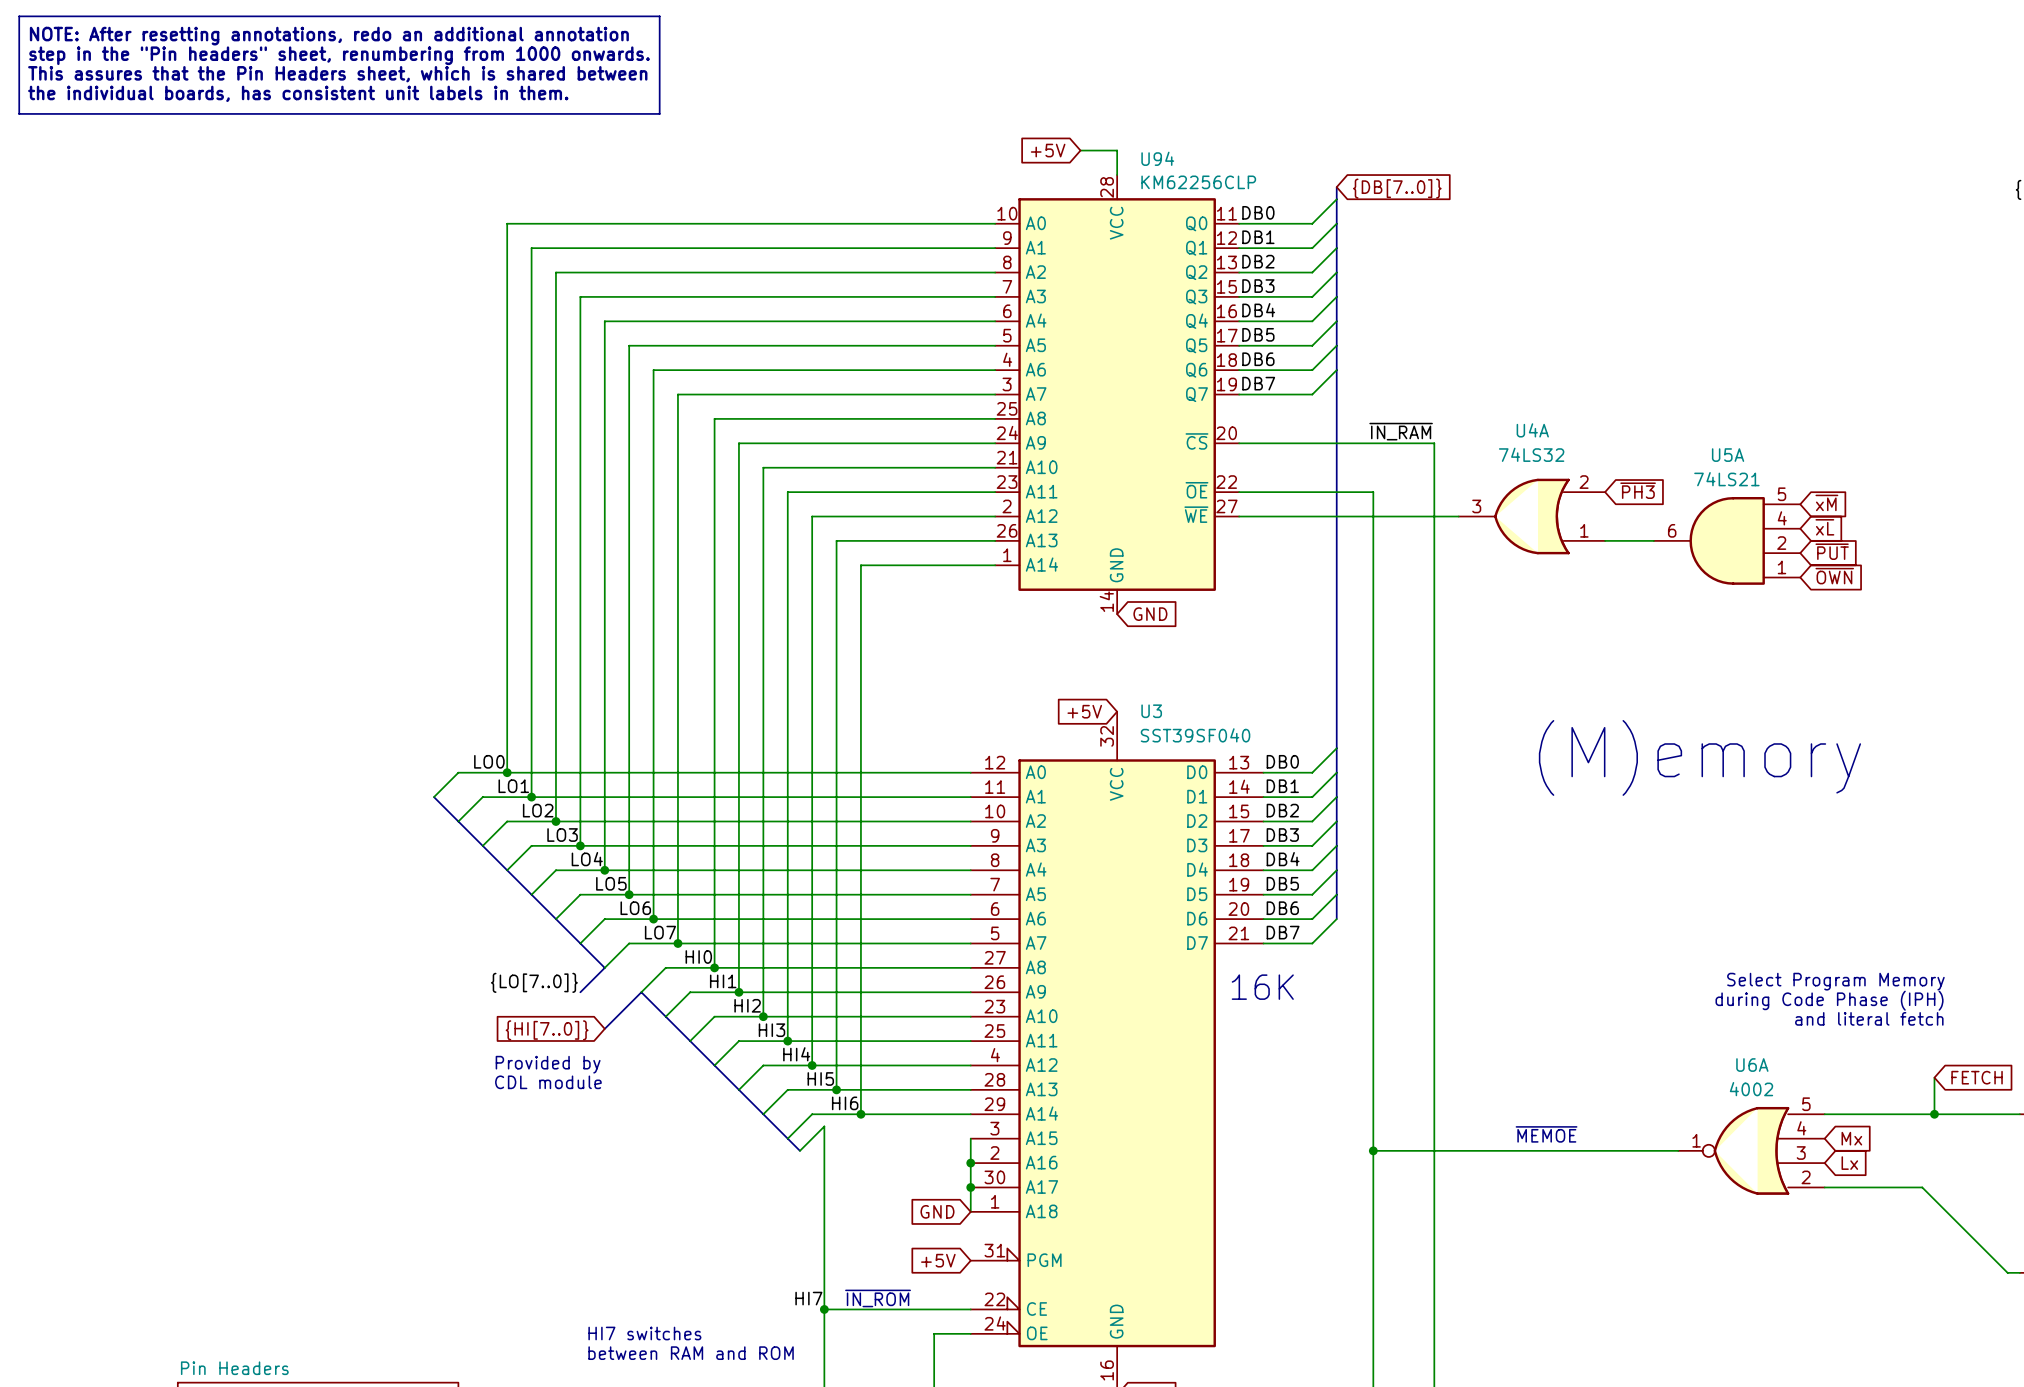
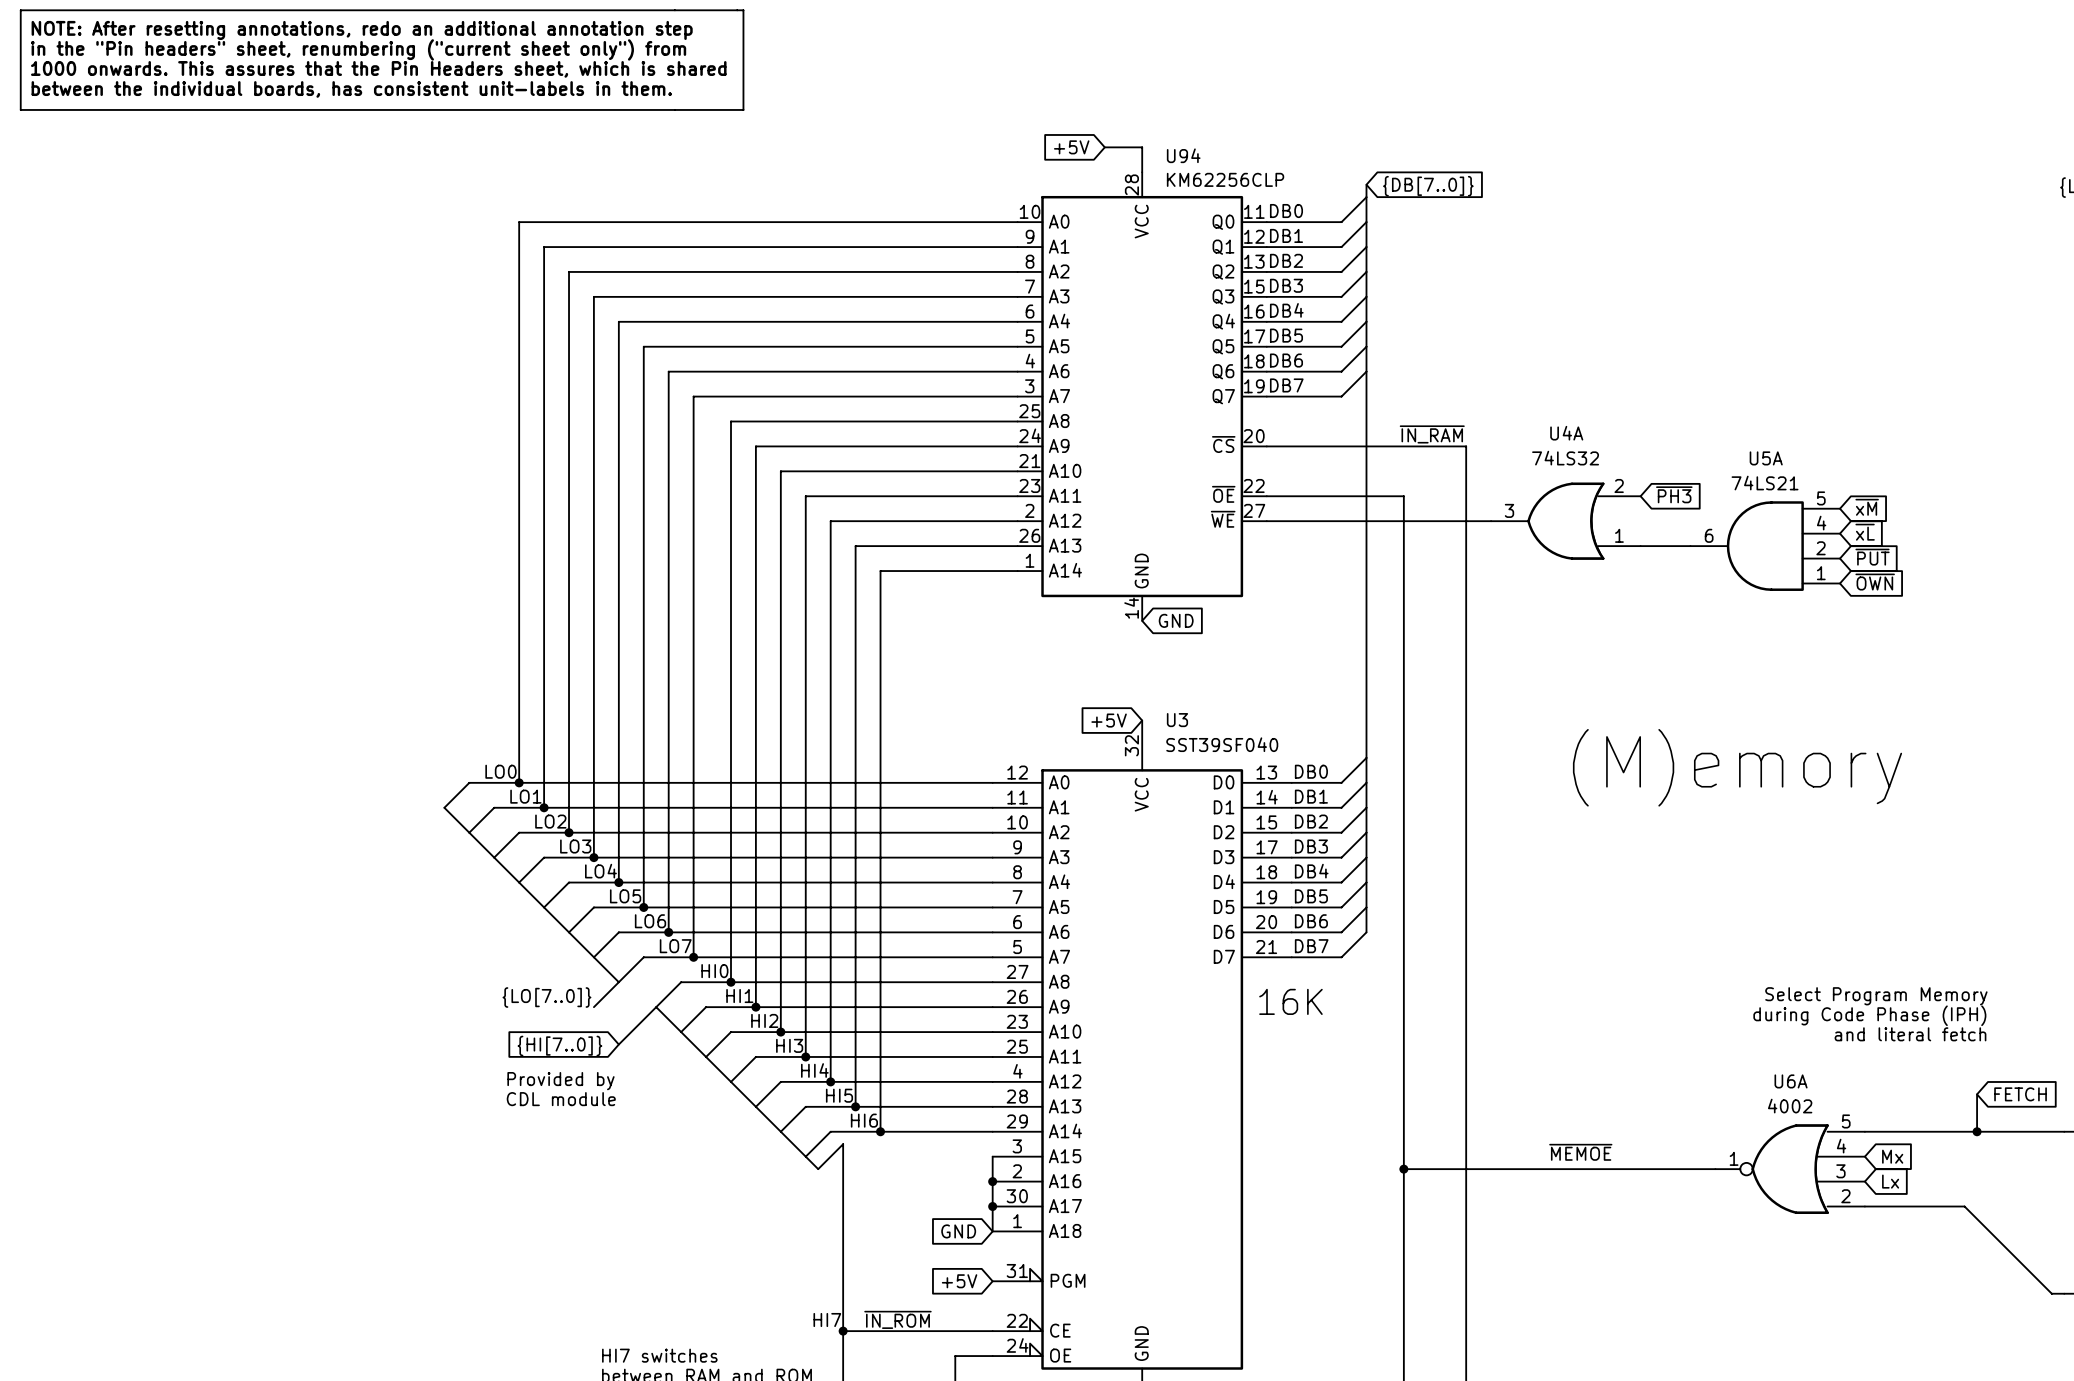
line: (659, 16) (659, 113) -> (674, 10) (743, 10) (743, 109) (674, 109)
text: NOTE: After resetting annotations, redo an additional annotation (329, 36) -> NOTE: After resetting annotations, redo an additional annotation step (362, 30)
text: step in the "Pin headers" sheet, renumbering from 1000 onwards. (339, 55) -> in the "Pin headers" sheet, renumbering ("current sheet only") from (358, 49)
text: This assures that the Pin Headers sheet, which is shared between (337, 74) -> 1000 onwards. This assures that the Pin Headers sheet, which is shared (378, 69)
text: the individual boards, has consistent unit labels in them. (298, 93) -> between the individual boards, has consistent unit-labels in them. (351, 89)

